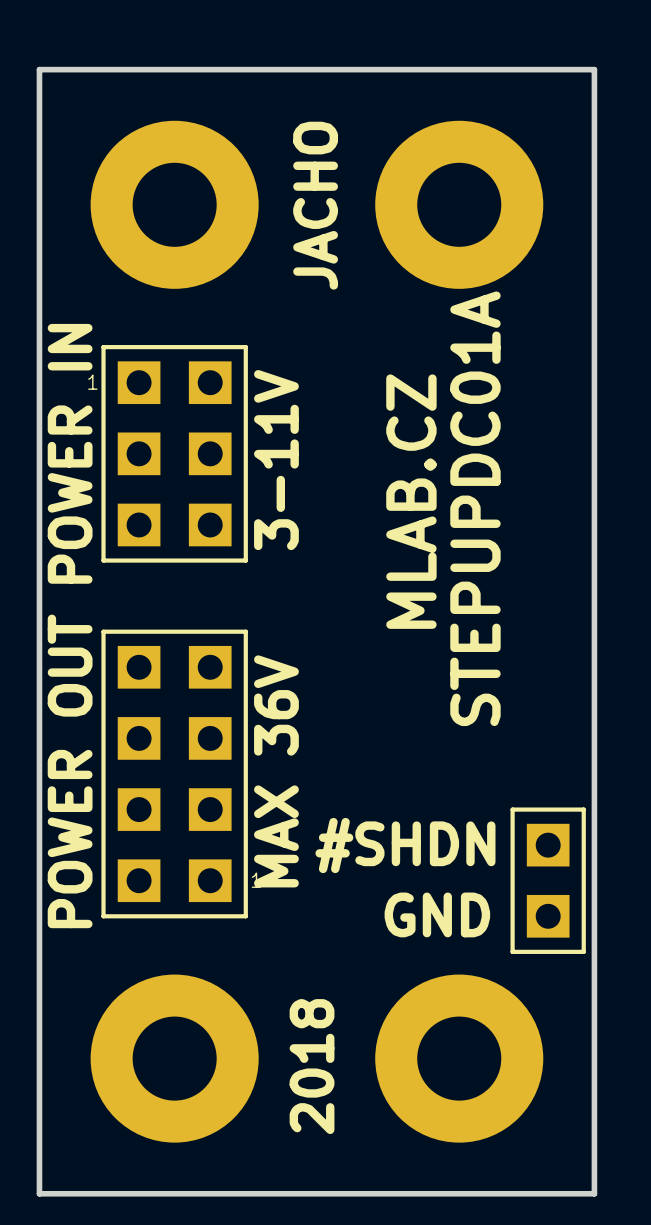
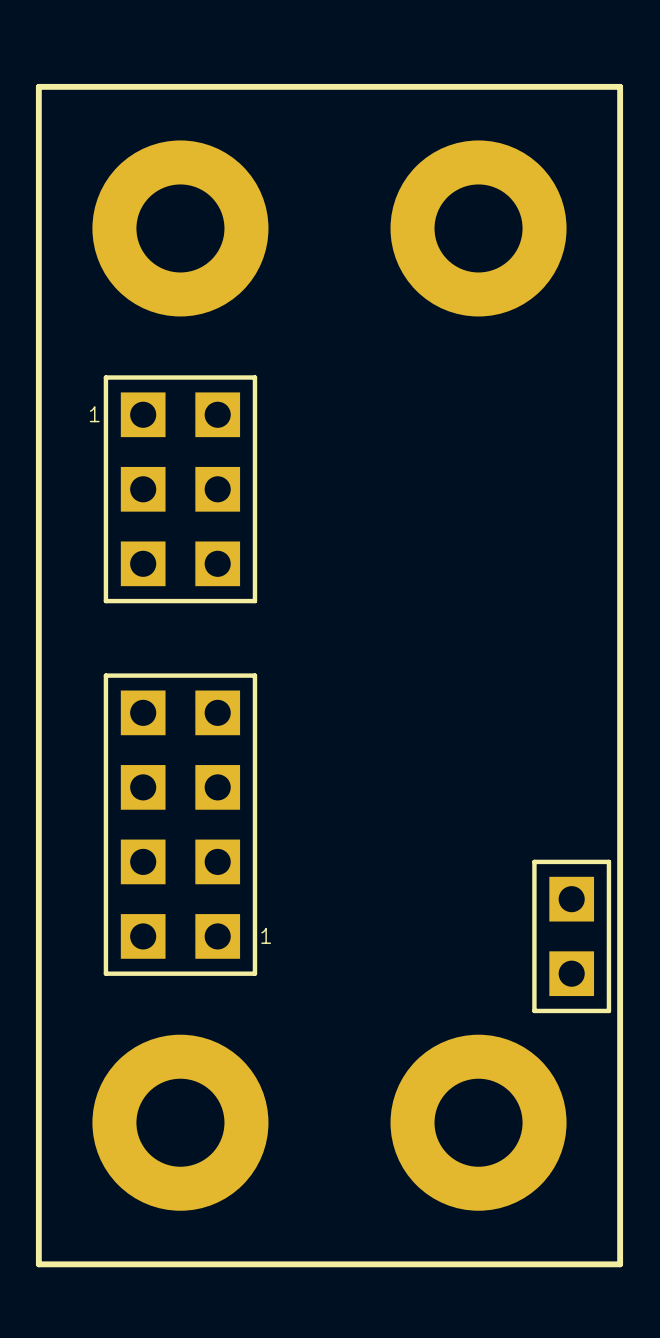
board edge: (39, 69) (594, 69) (594, 1193) (39, 1193) (39, 69) -> none
line: none -> (38, 86) (620, 86) (620, 1264) (38, 1264) (38, 86)
text: JACHO (315, 205) -> none
text: POWER IN (70, 453) -> none
text: 3-11V (276, 460) -> none
text: MLAB.CZ (411, 501) -> none
text: STEPUPDC01A (475, 508) -> none
text: POWER OUT (70, 771) -> none
text: MAX 36V (276, 771) -> none
text: #SHDN (405, 845) -> none
text: GND (437, 914) -> none
text: 2018 (312, 1066) -> none

